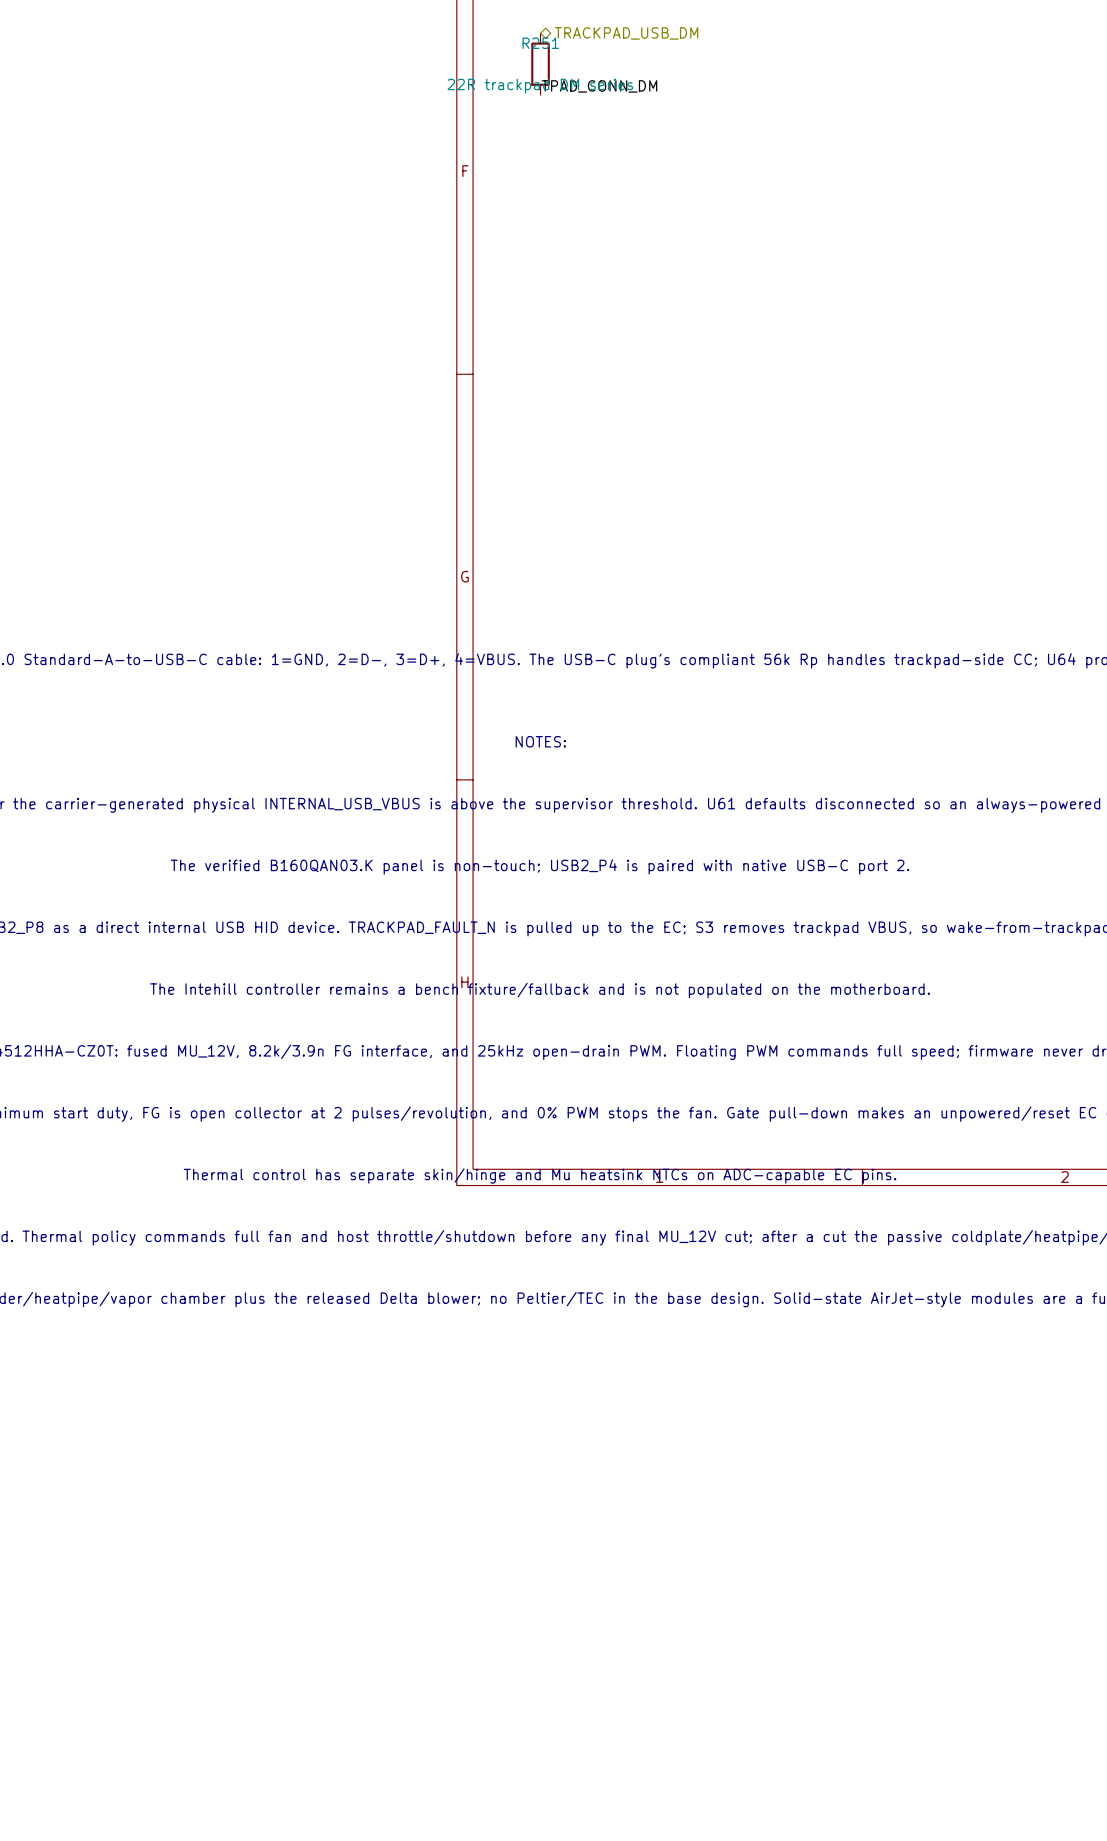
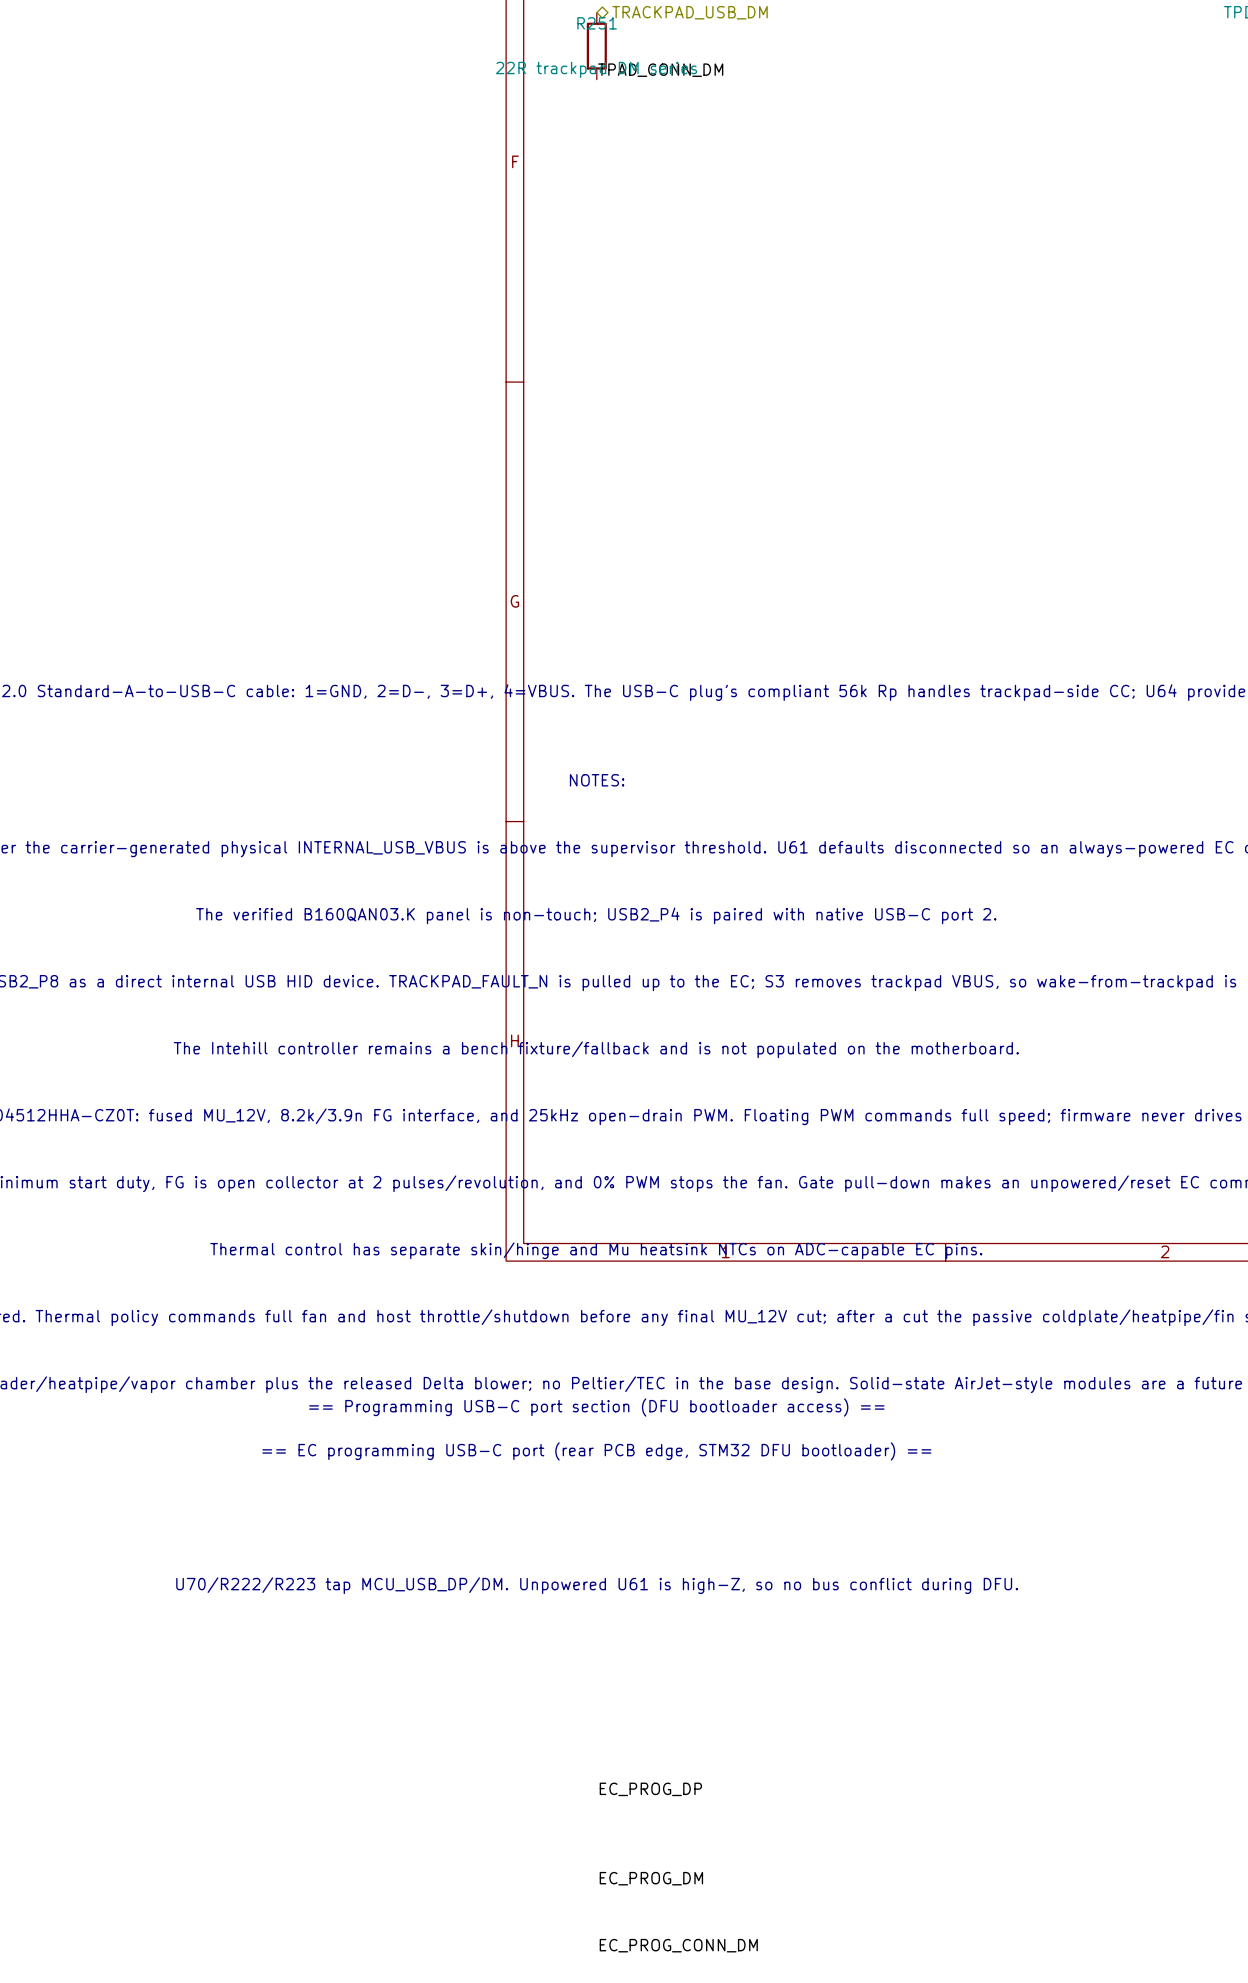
text: none -> == Programming USB-C port section (DFU bootloader access) == (596, 1407)
text: none -> == EC programming USB-C port (rear PCB edge, STM32 DFU bootloader) == (596, 1451)
text: none -> U70/R222/R223 tap MCU_USB_DP/DM. Unpowered U61 is high-Z, so no bus conflict during DFU. (597, 1585)
label: none -> EC_PROG_DP (650, 1789)
label: none -> EC_PROG_DM (651, 1878)
label: none -> EC_PROG_CONN_DM (678, 1945)

